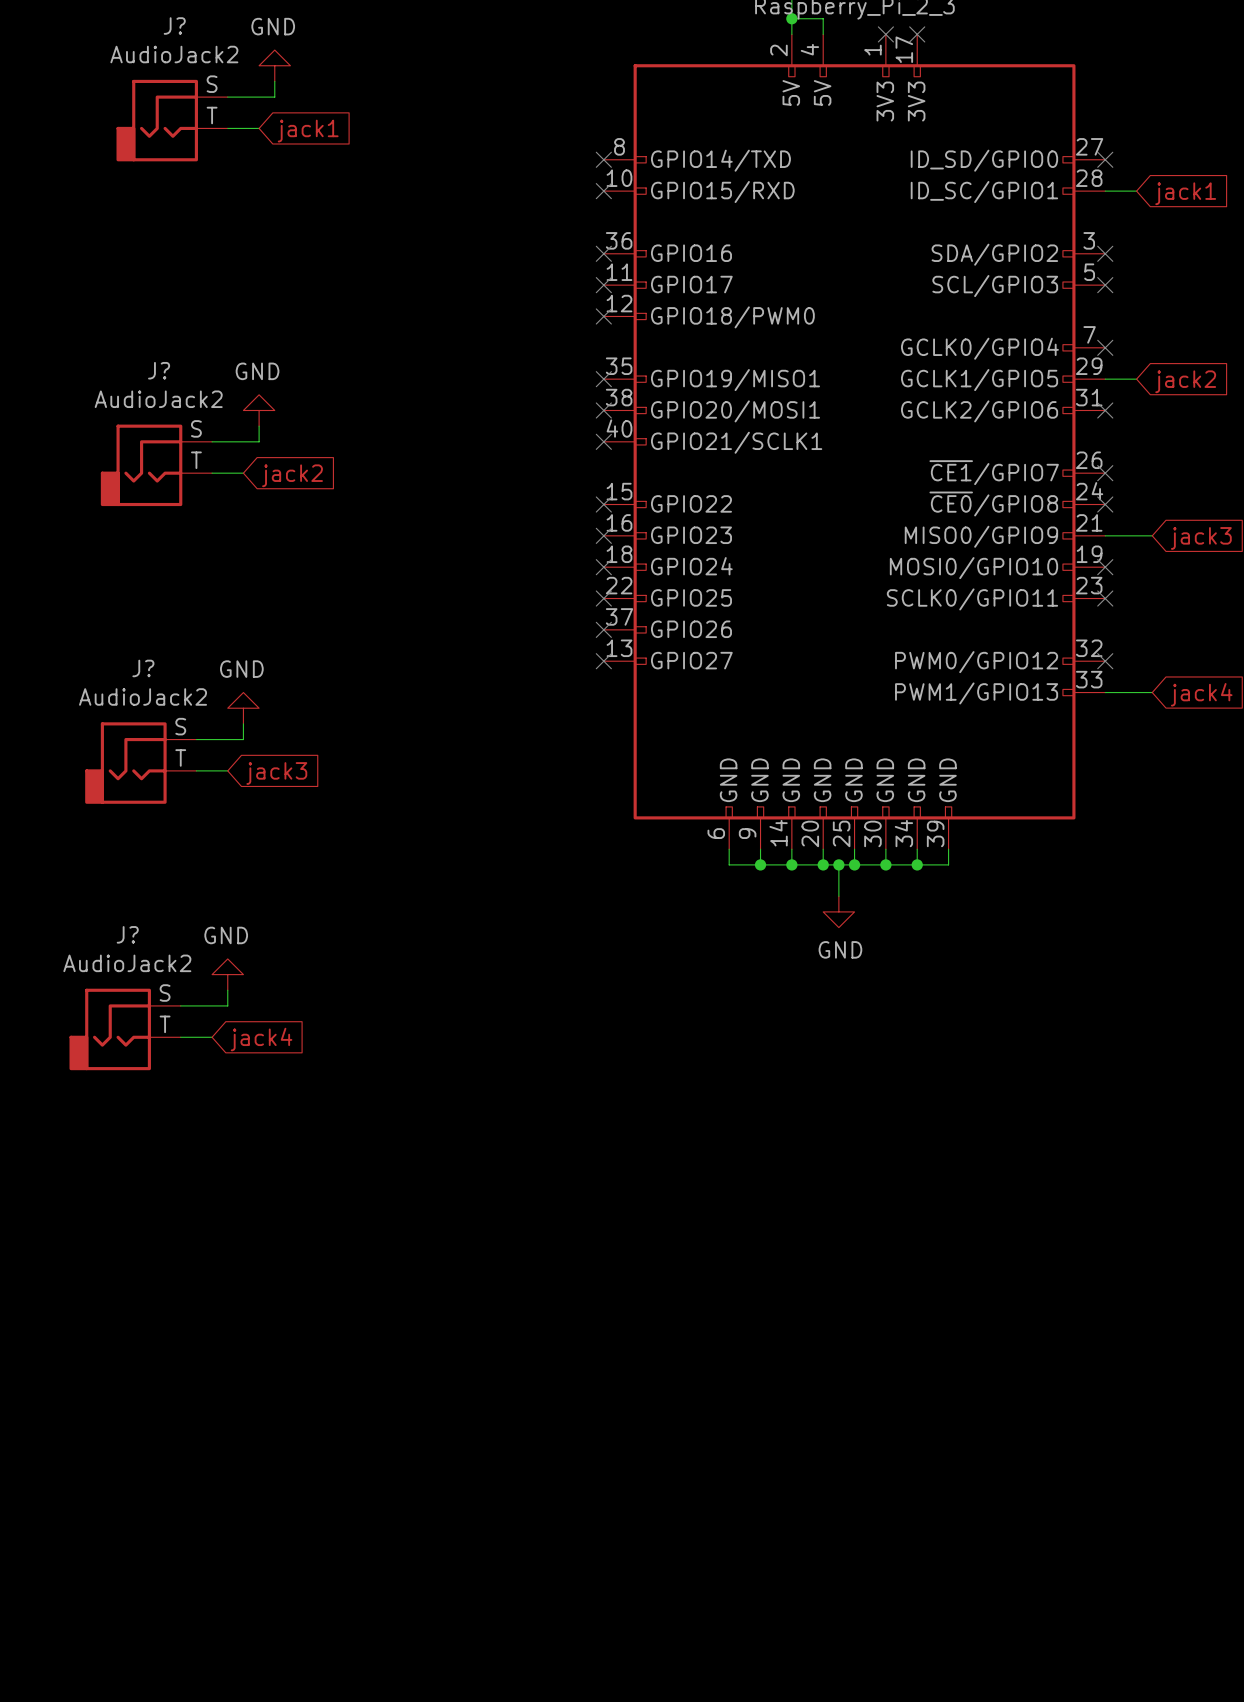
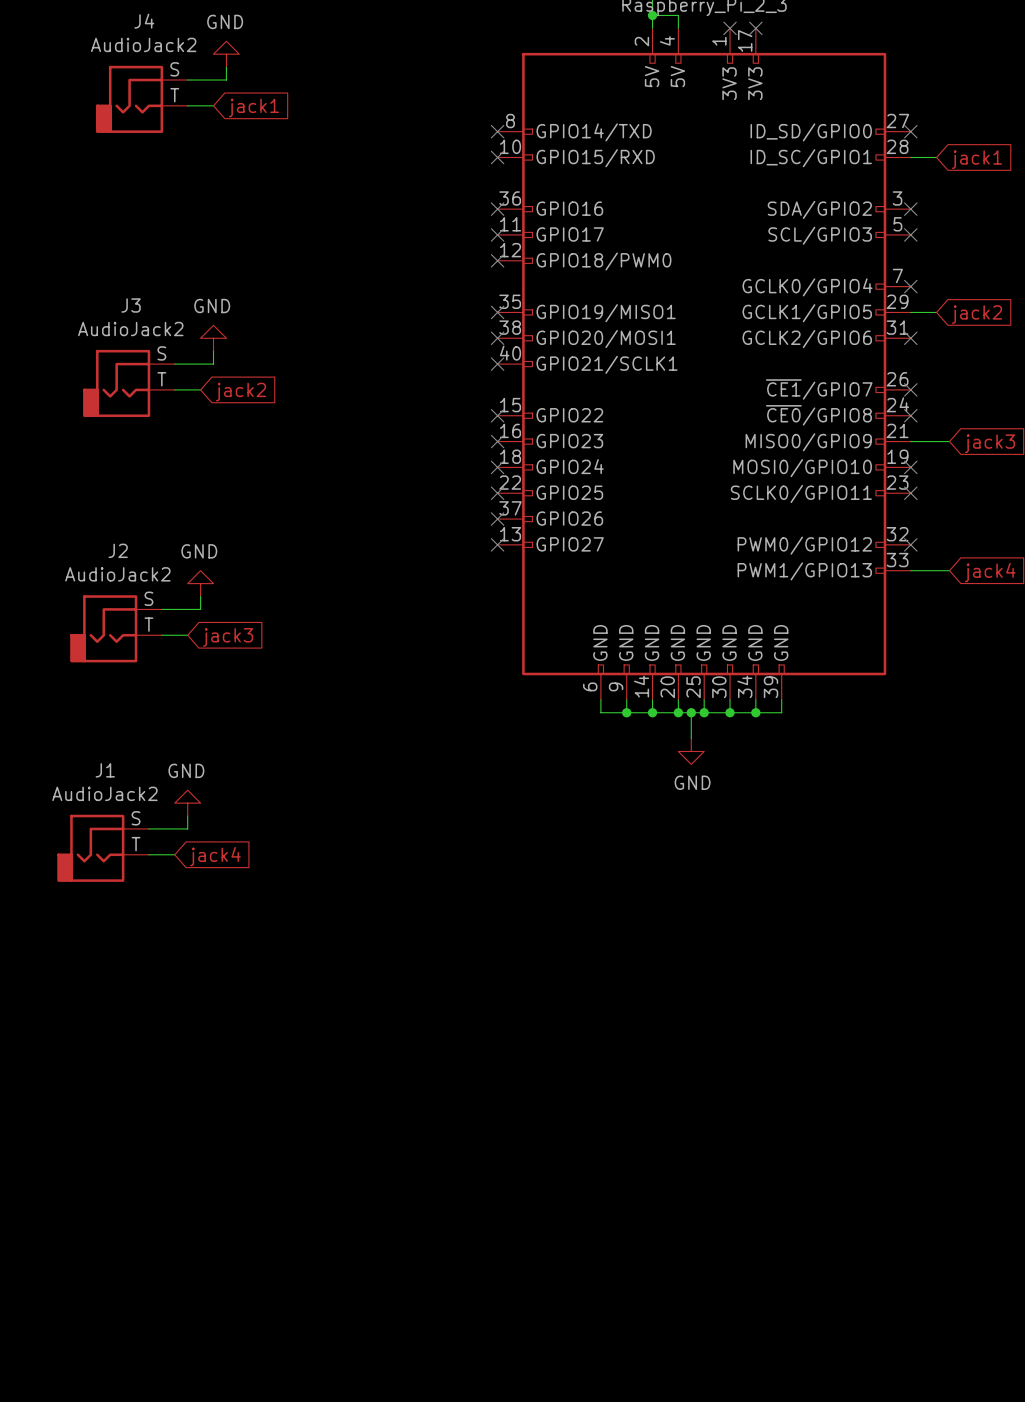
J? name: J? (174, 25) -> J4 (144, 21)
J? name: J? (159, 370) -> J3 (131, 305)
J? name: J? (143, 668) -> J2 (118, 550)
J? name: J? (127, 934) -> J1 (105, 770)

